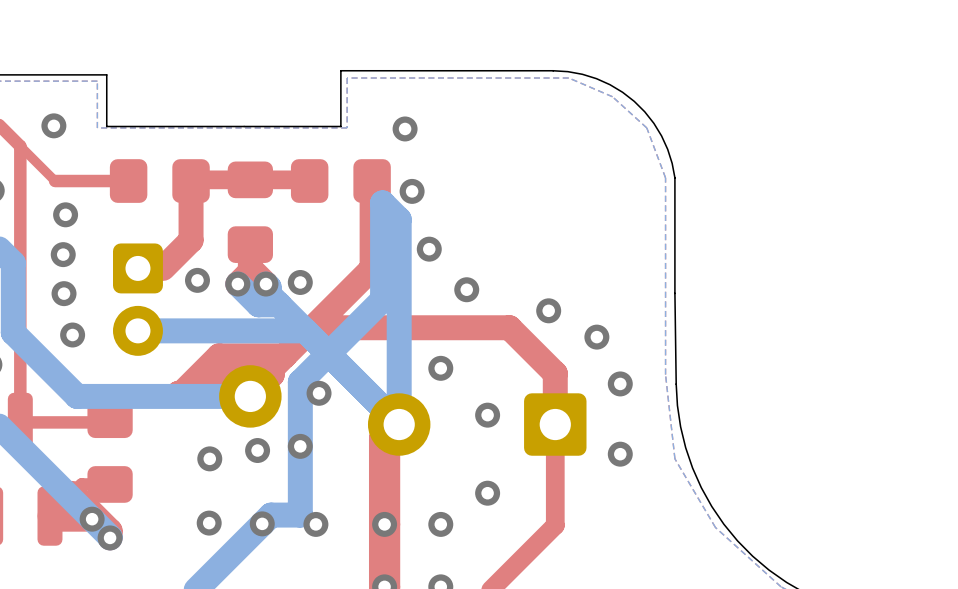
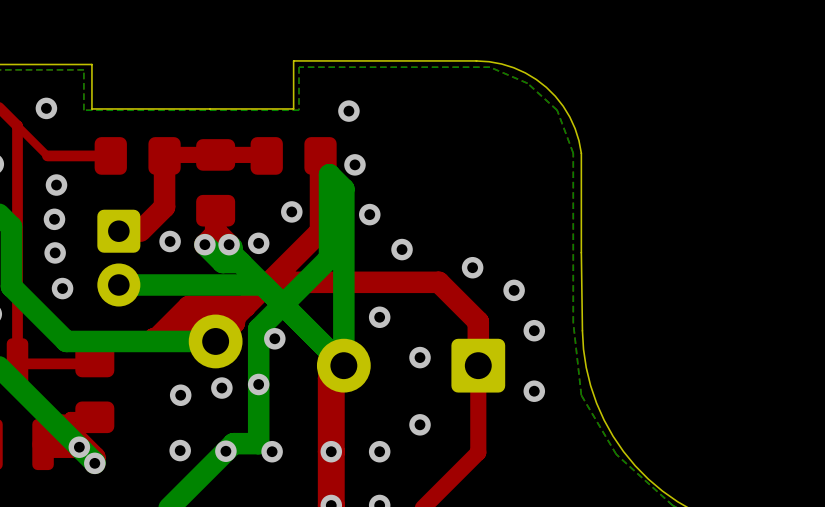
via: none -> (291, 211)

